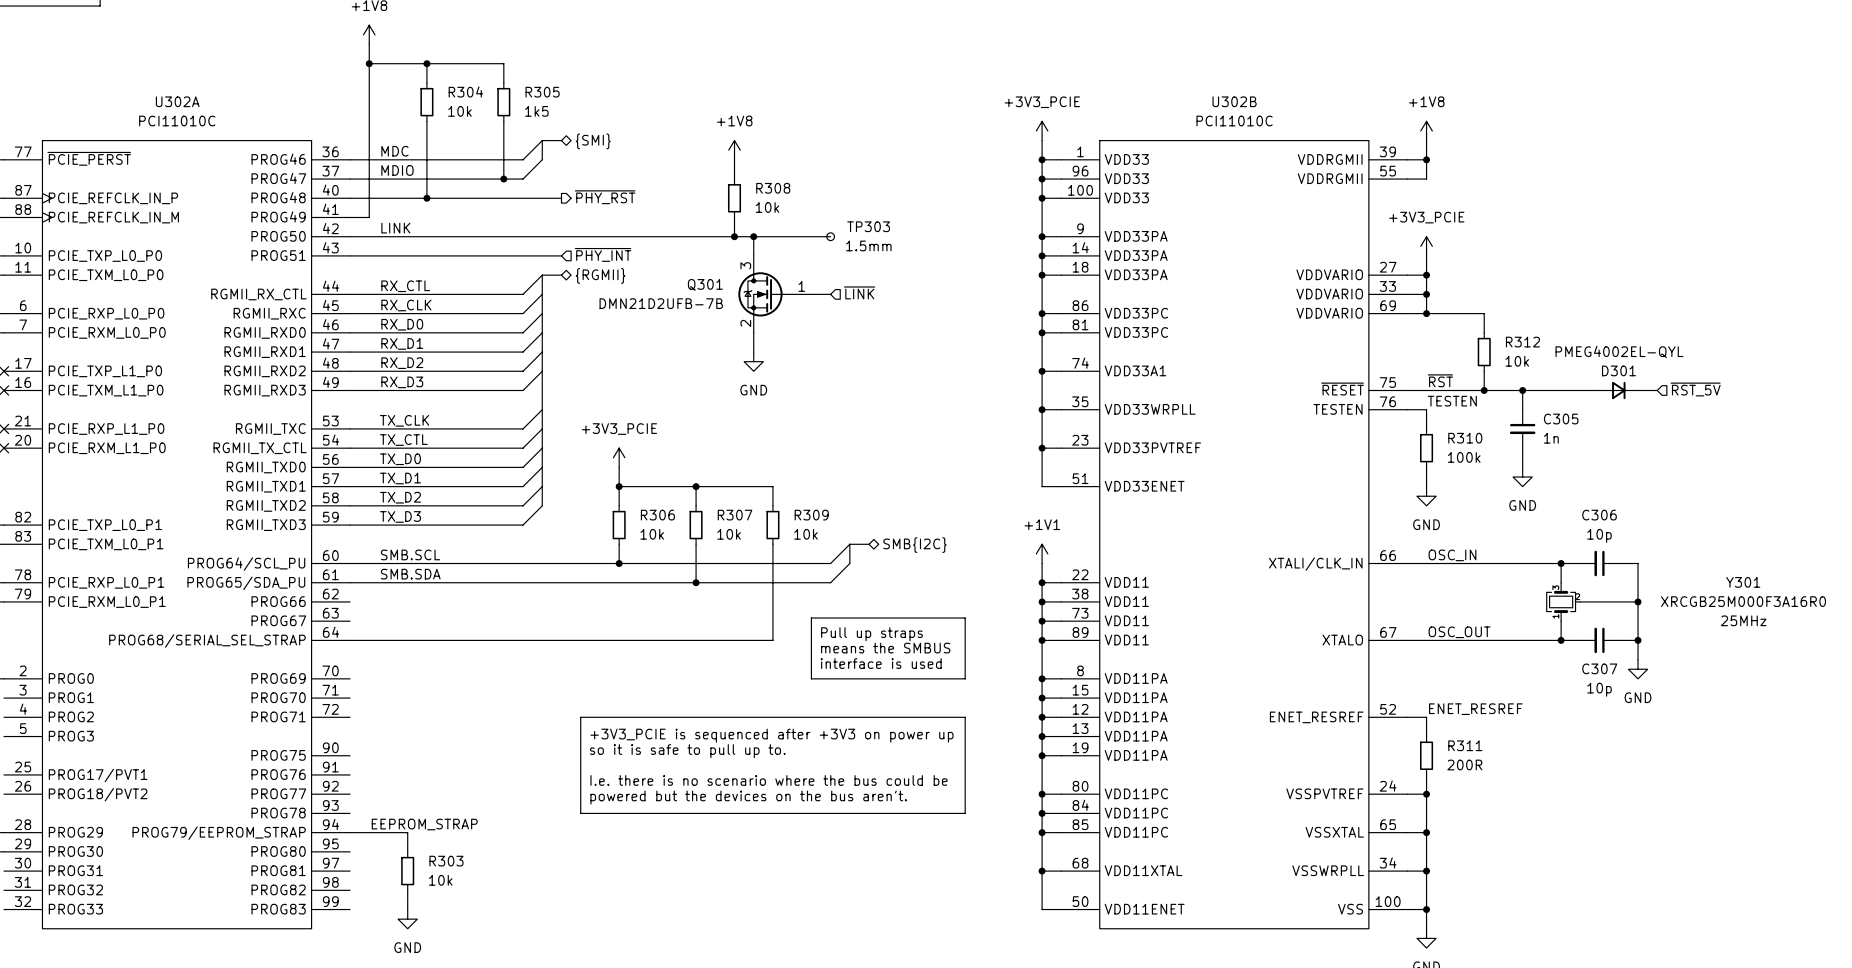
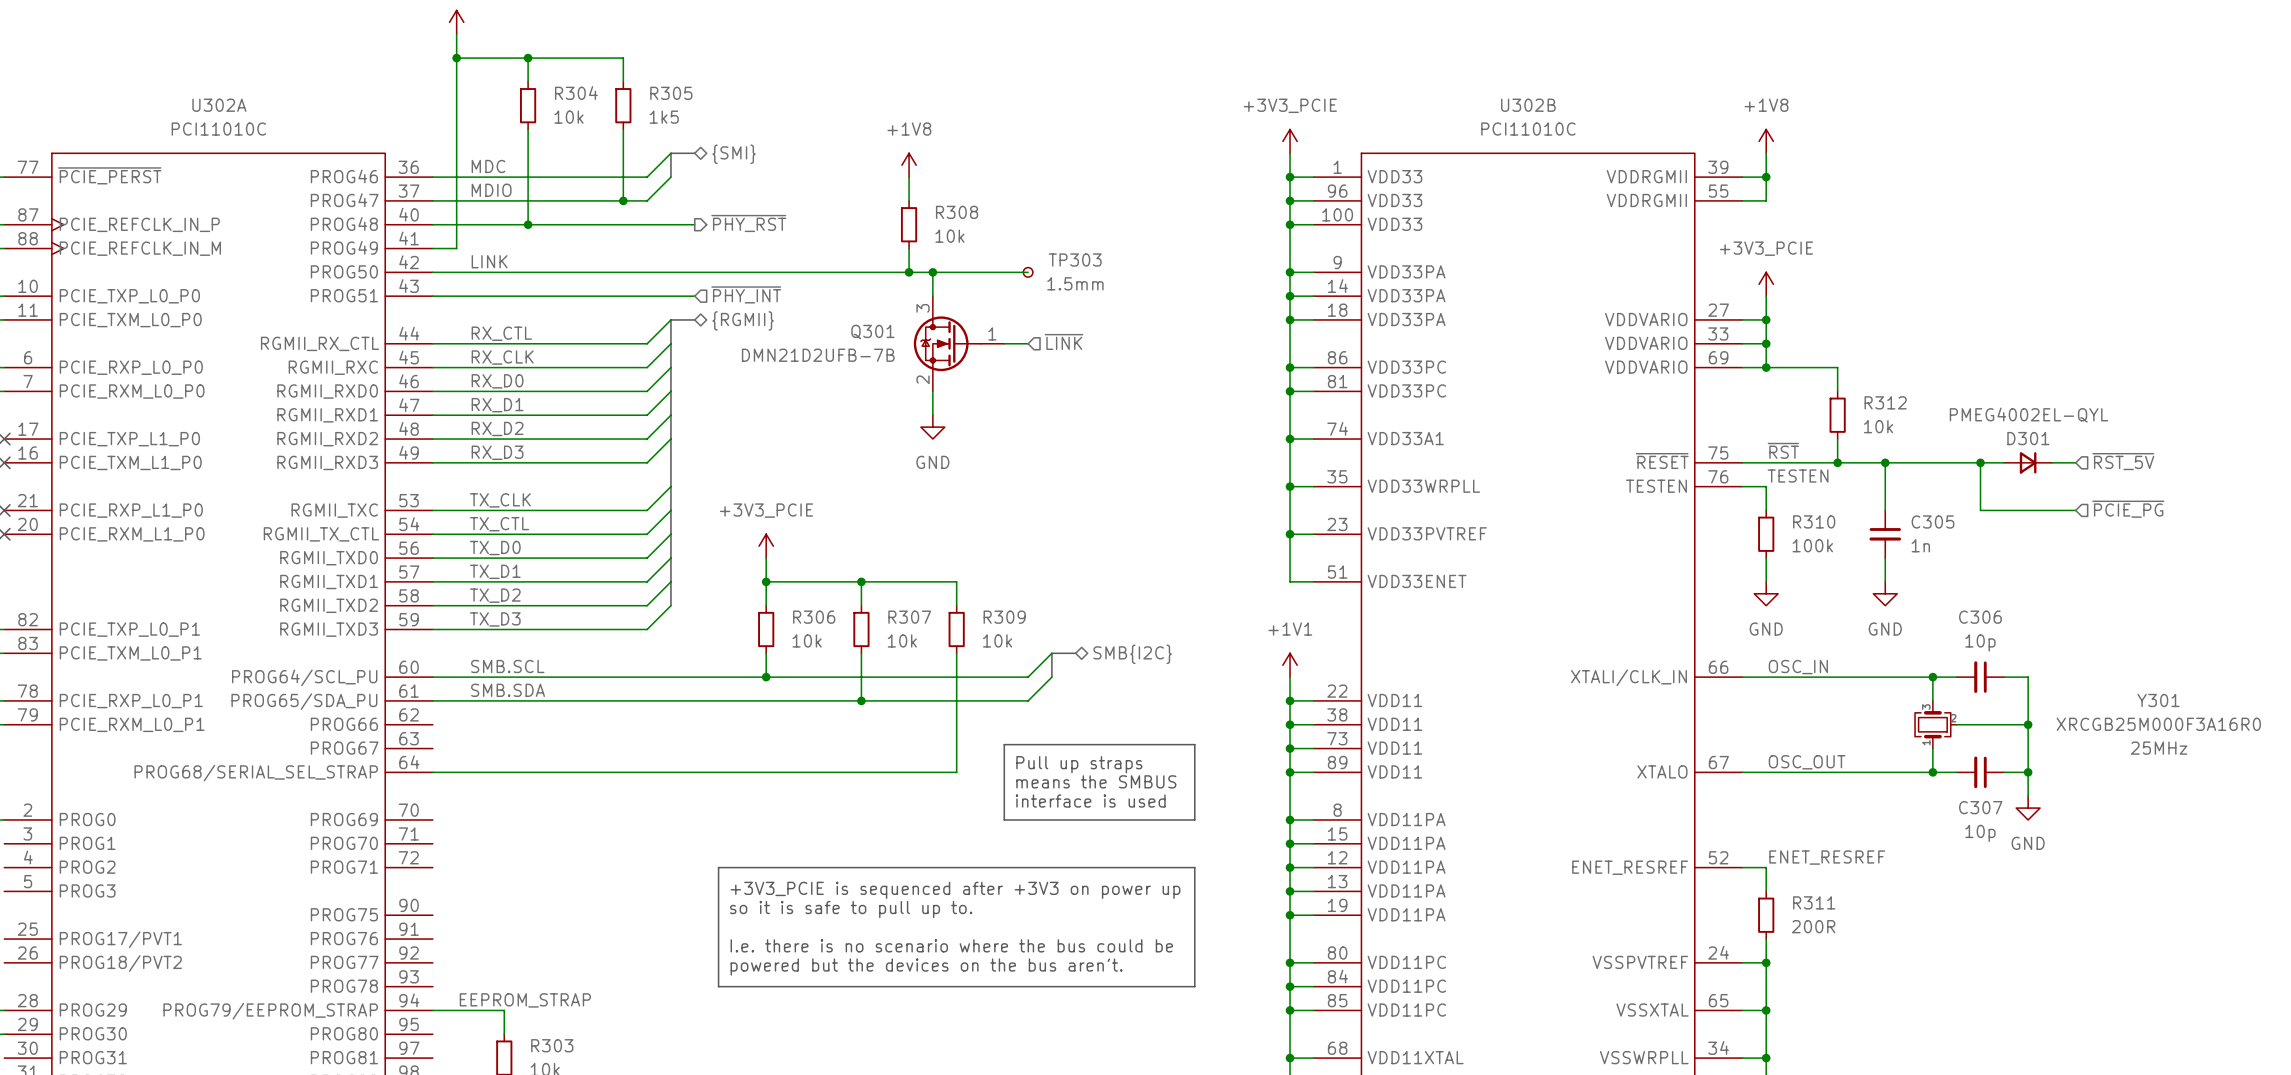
hierarchical label position: ~{RST_5V} (1695, 389) -> ~{RST_5V} (2123, 461)
junction: none -> (1980, 462)
wire: none -> (2004, 462) (1980, 462) (1980, 510) (2075, 510)
D301 position: (1618, 390) -> (2028, 462)
hierarchical label: none -> ~{PCIE_PG} (2128, 509)
C305 position: (1522, 428) -> (1885, 534)
power symbol position: GND (1522, 477) -> GND (1885, 593)

